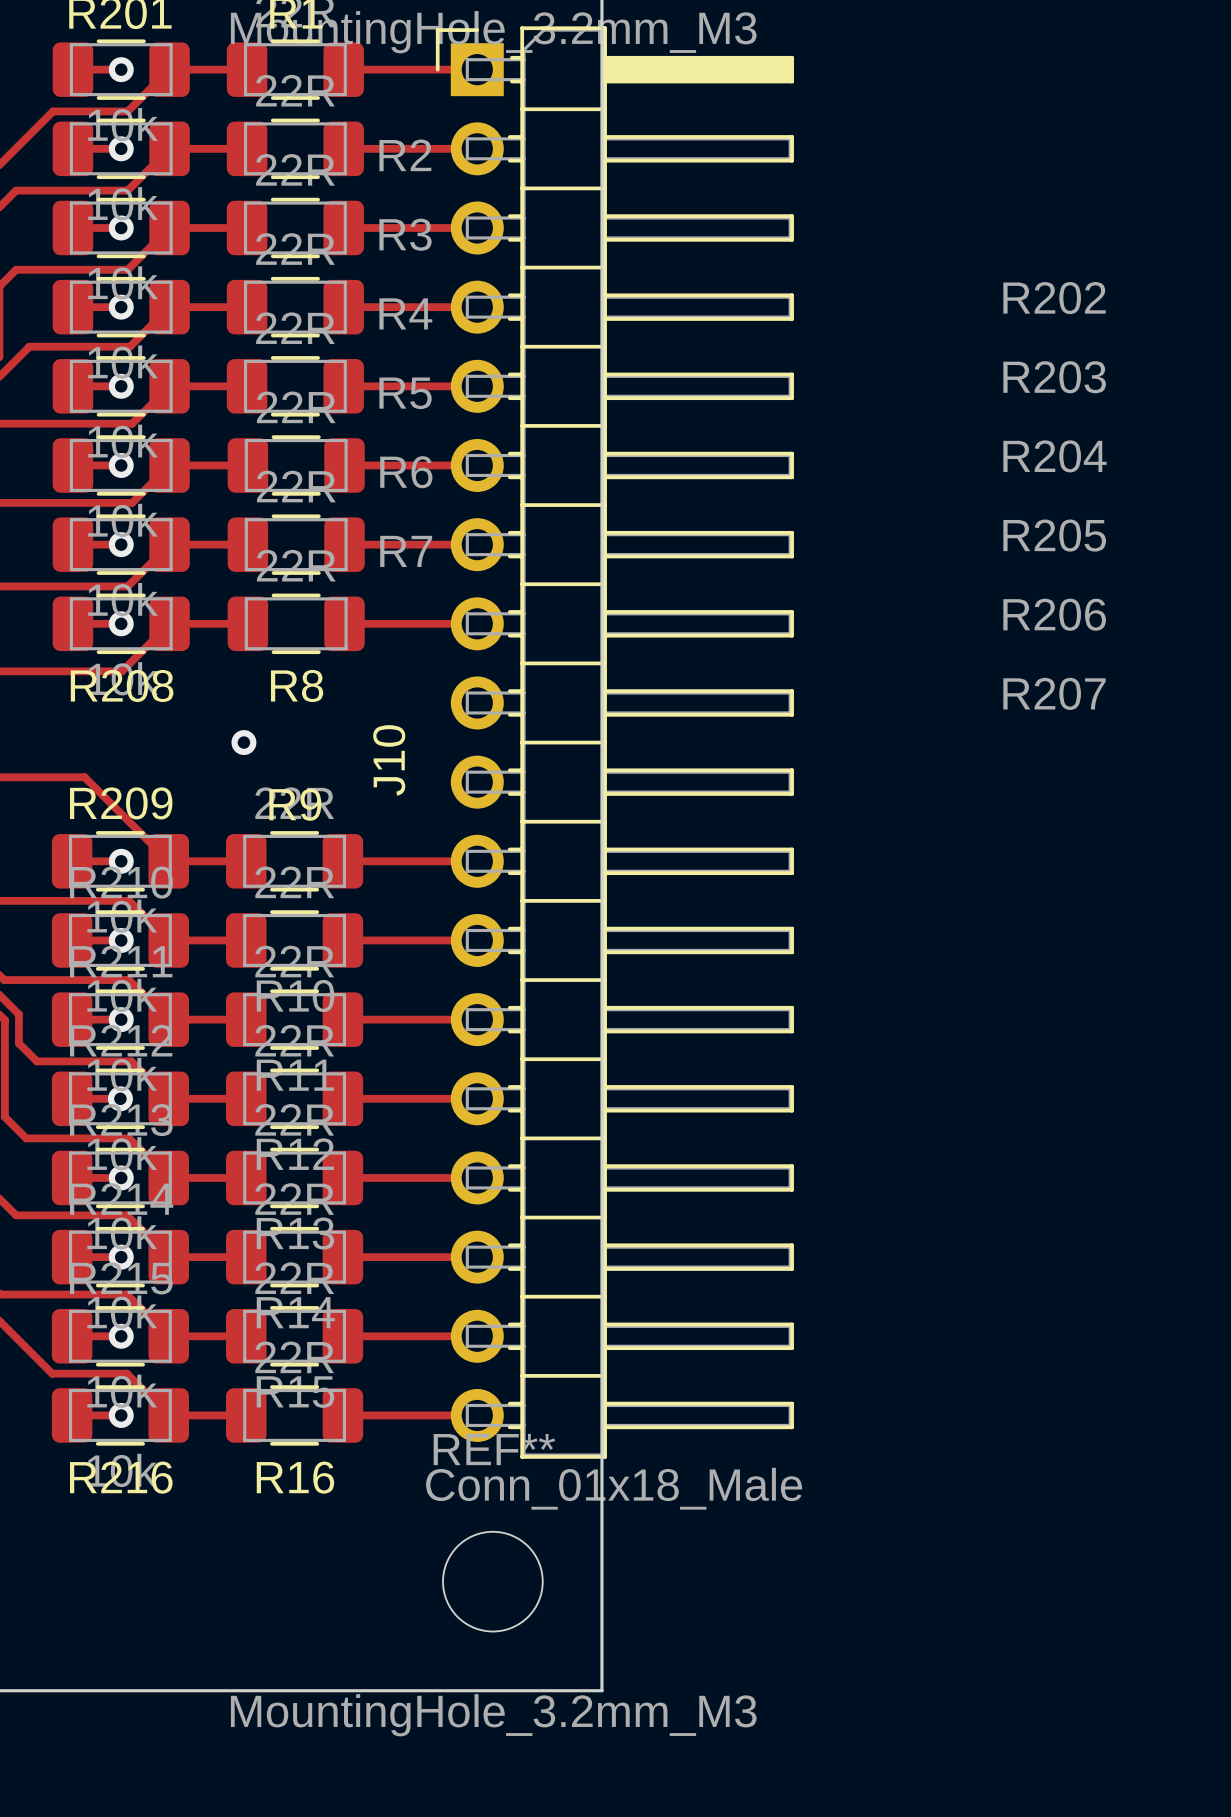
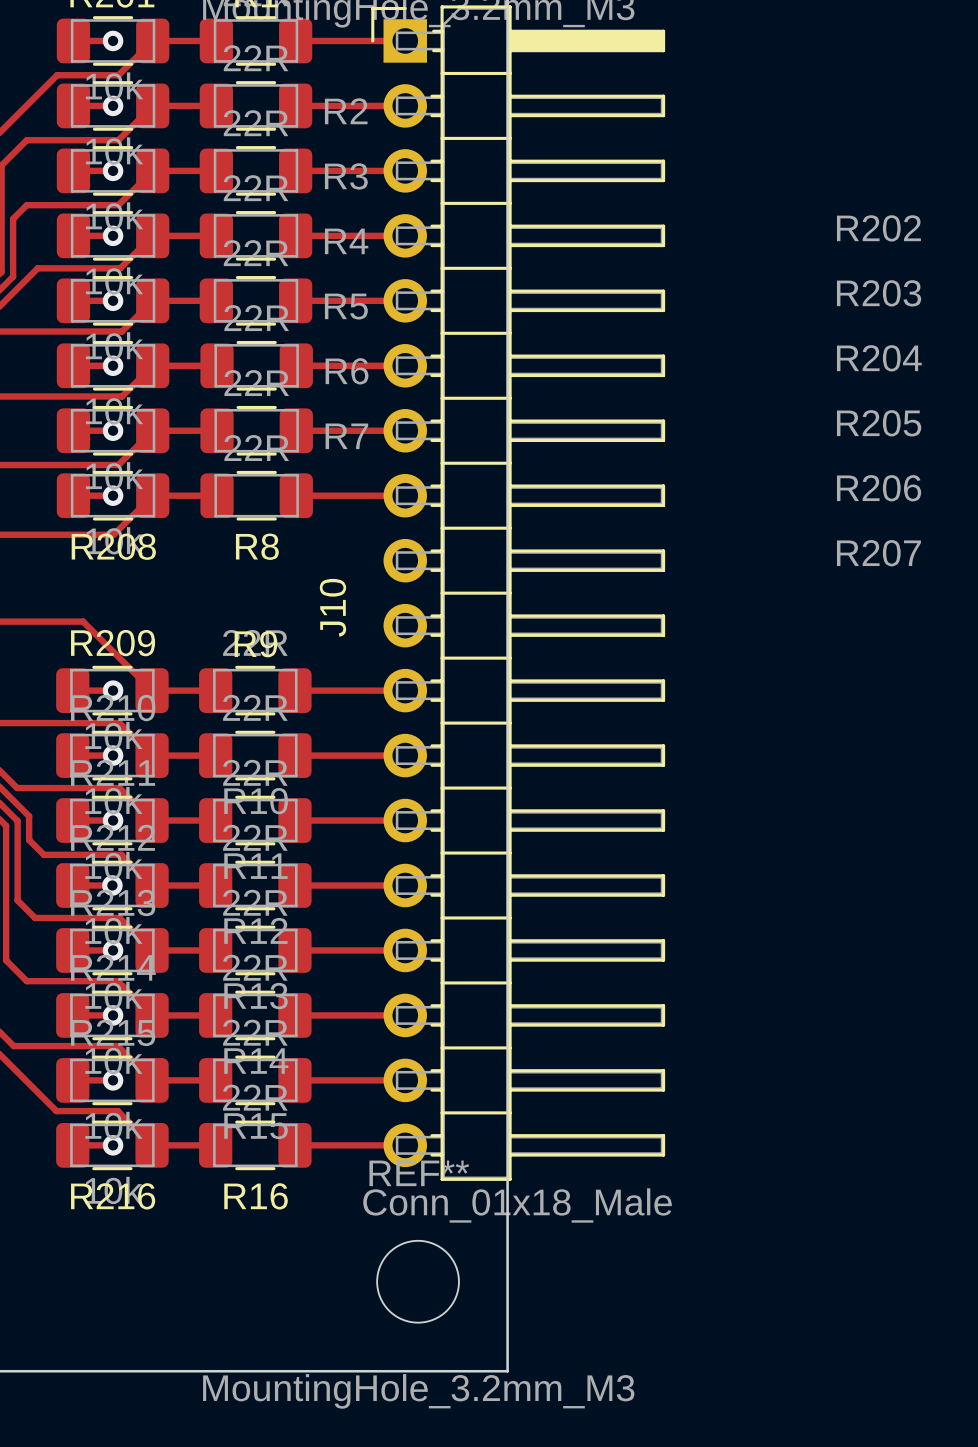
via: (243, 742) -> none

